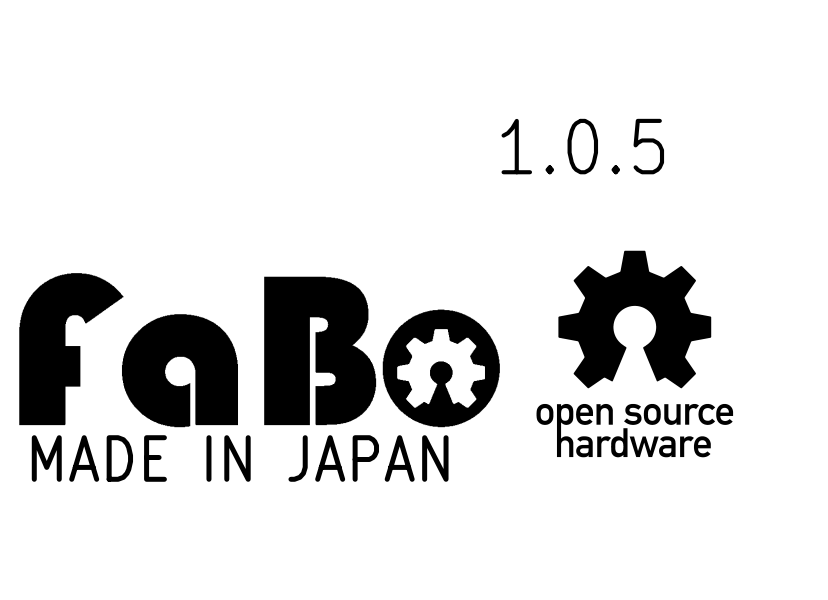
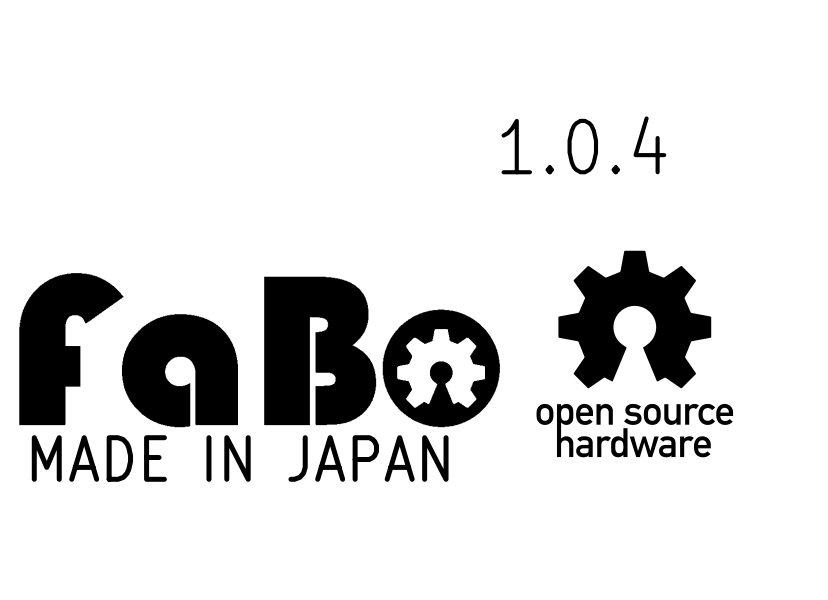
text: 1.0.5 (582, 146) -> 1.0.4 (583, 145)

